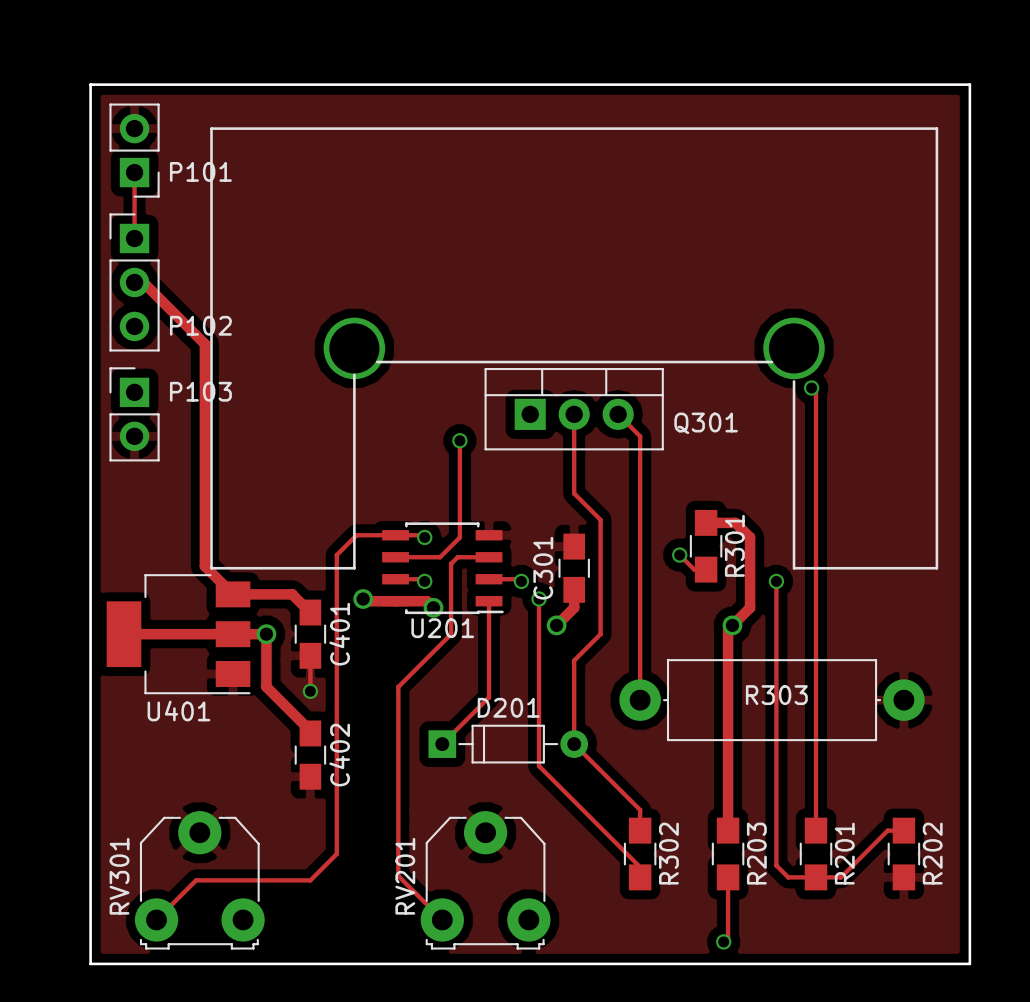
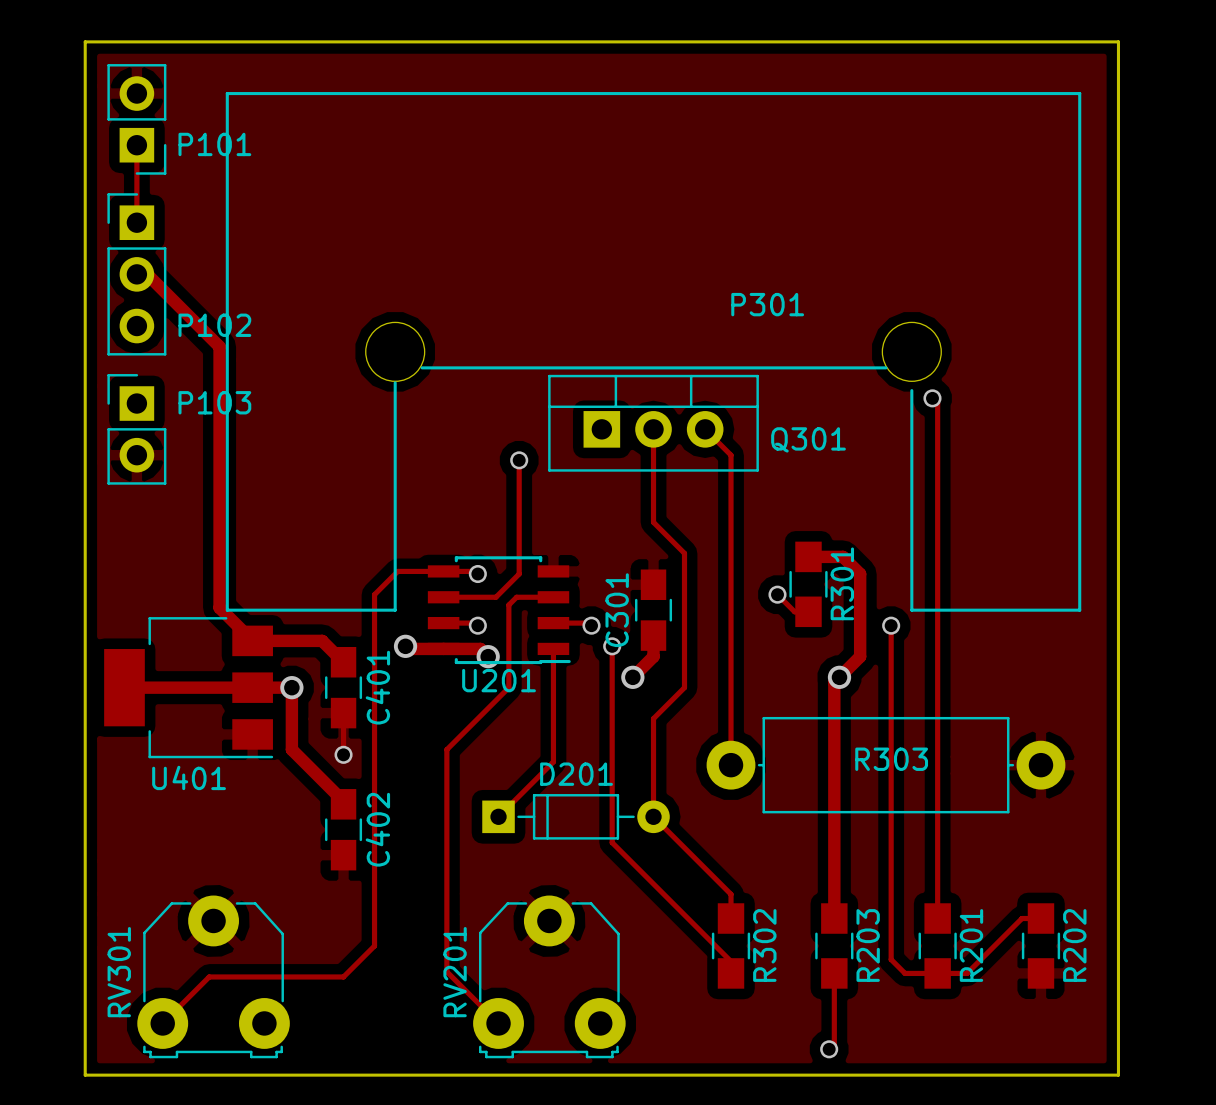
part: (574, 348) -> none
P301: none -> (653, 351)

